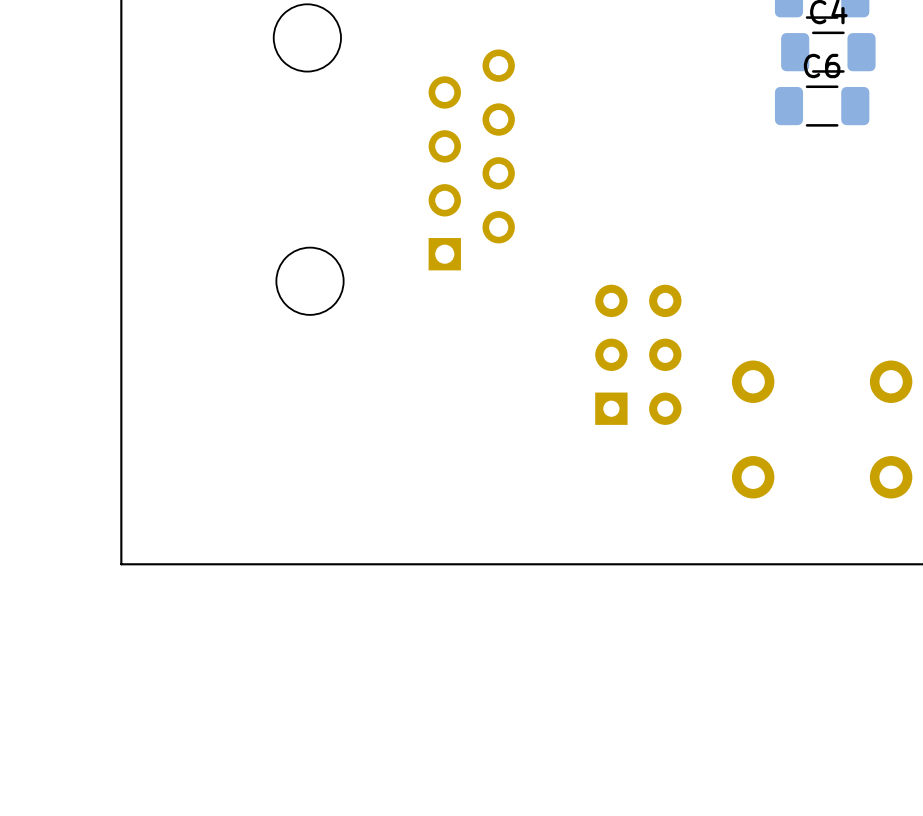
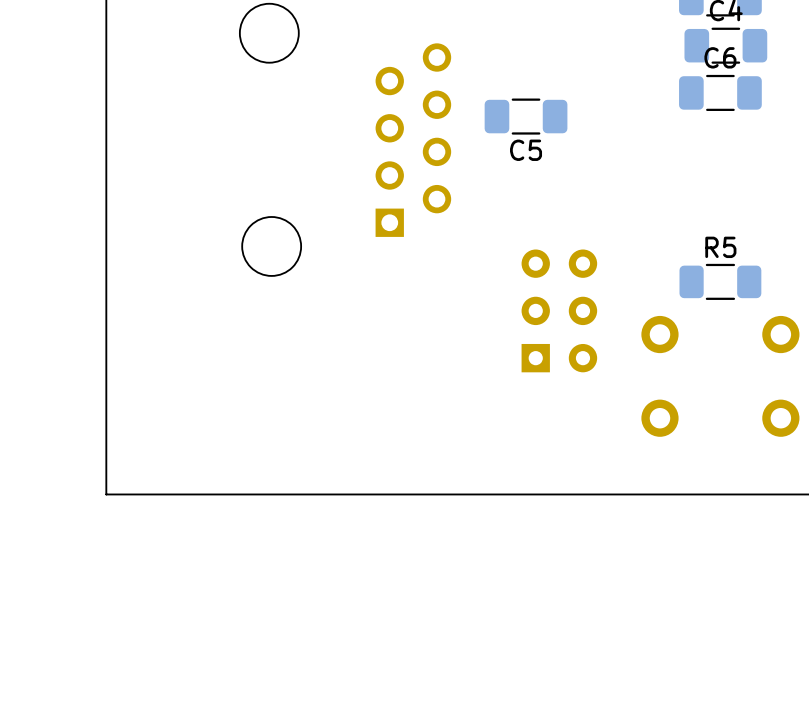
C5: none -> (526, 116)
R5: none -> (720, 281)

